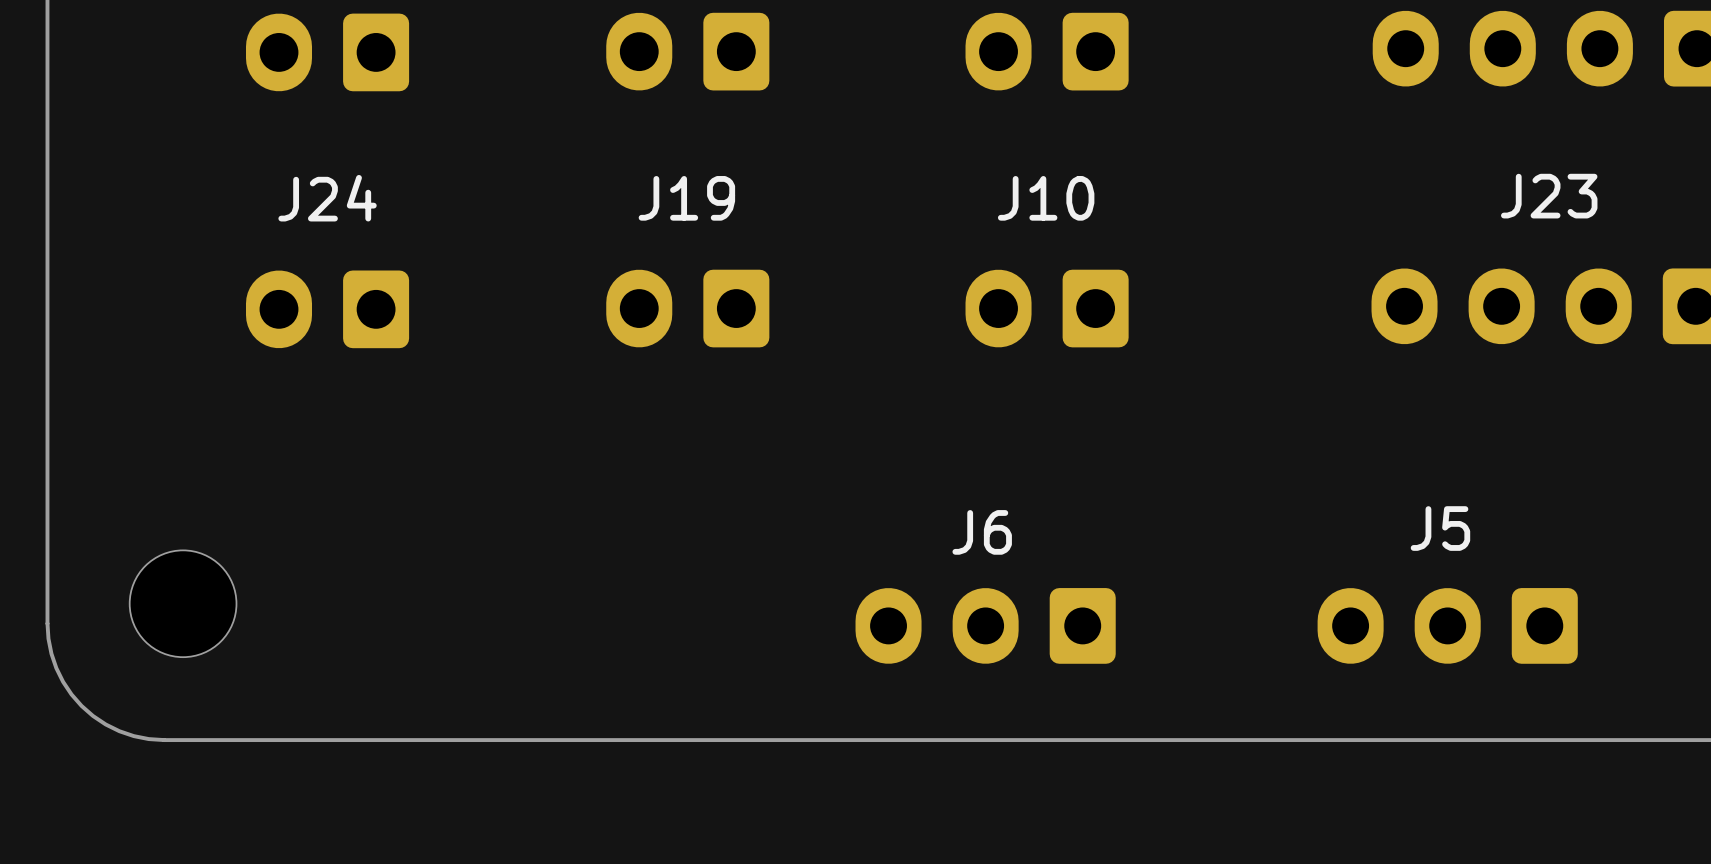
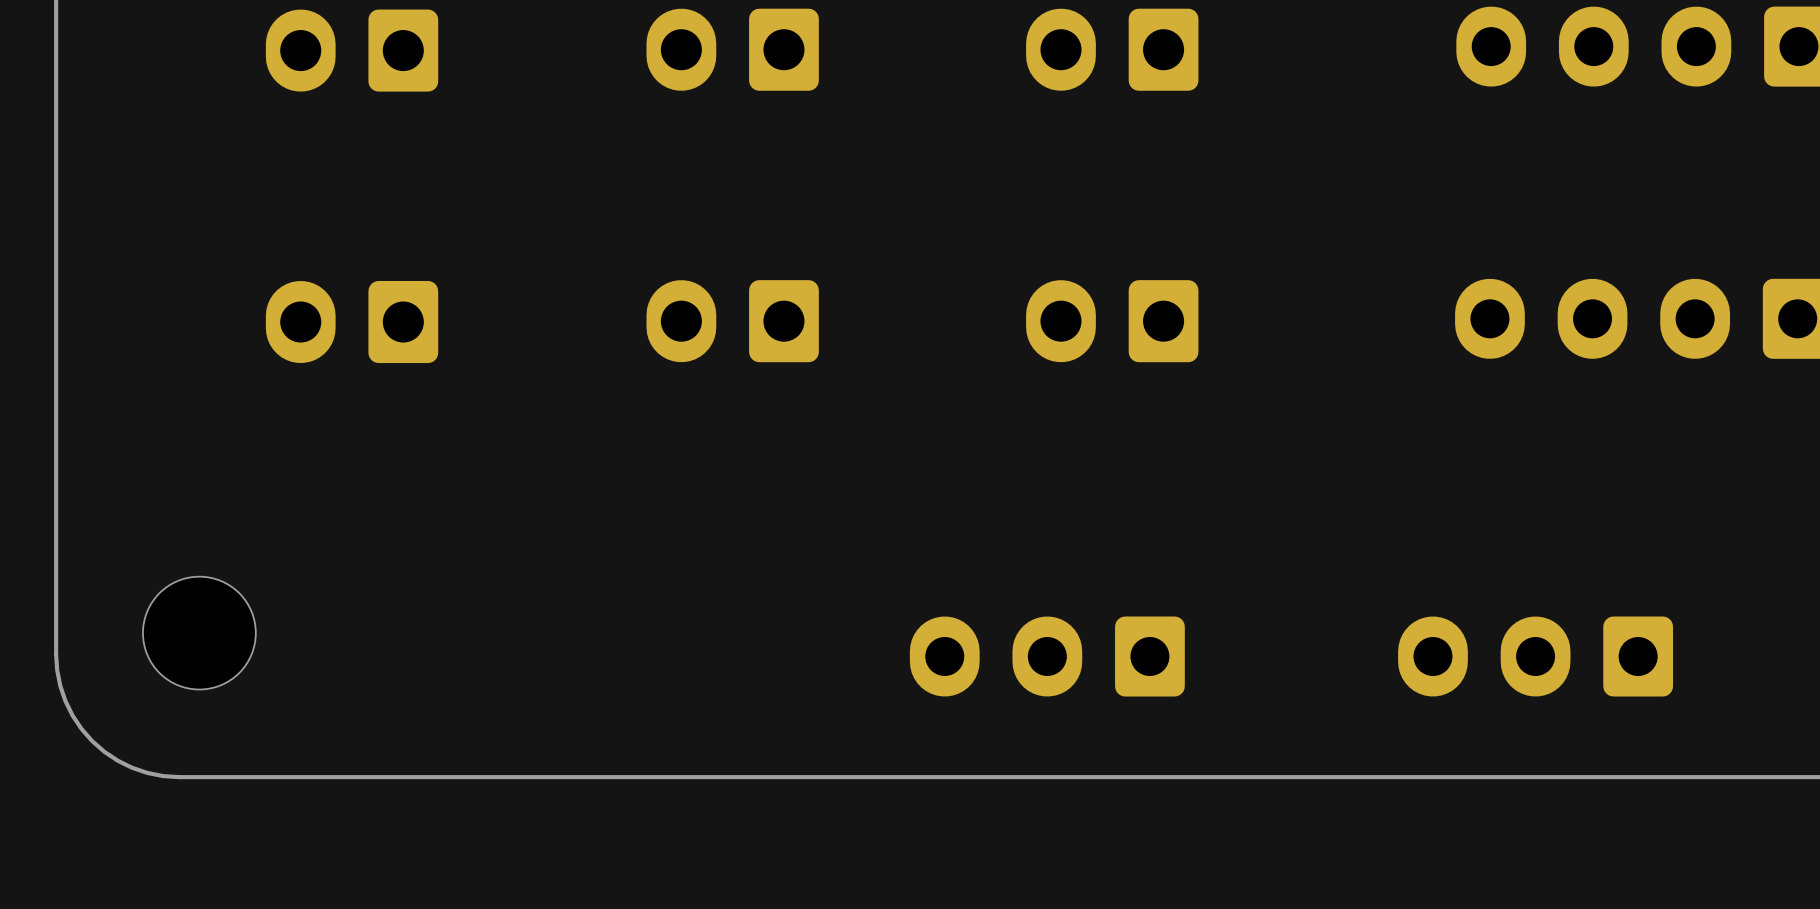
J23 name: J23 (1549, 196) -> none
J24 name: J24 (327, 198) -> none
J19 name: J19 (686, 198) -> none
J10 name: J10 (1046, 198) -> none
J5 name: J5 (1440, 528) -> none
J6 name: J6 (982, 532) -> none

